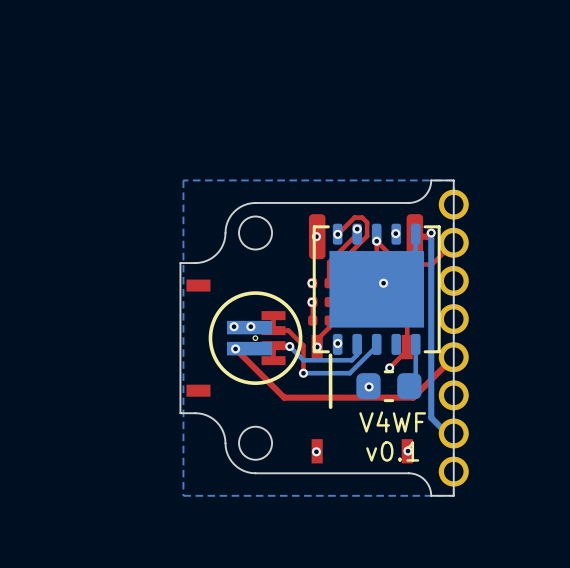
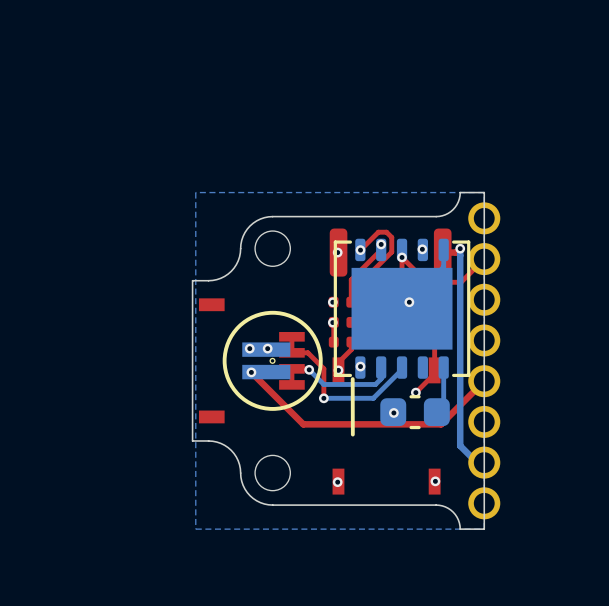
text: V4WF (392, 421) -> none
text: v0.1 (392, 451) -> none

